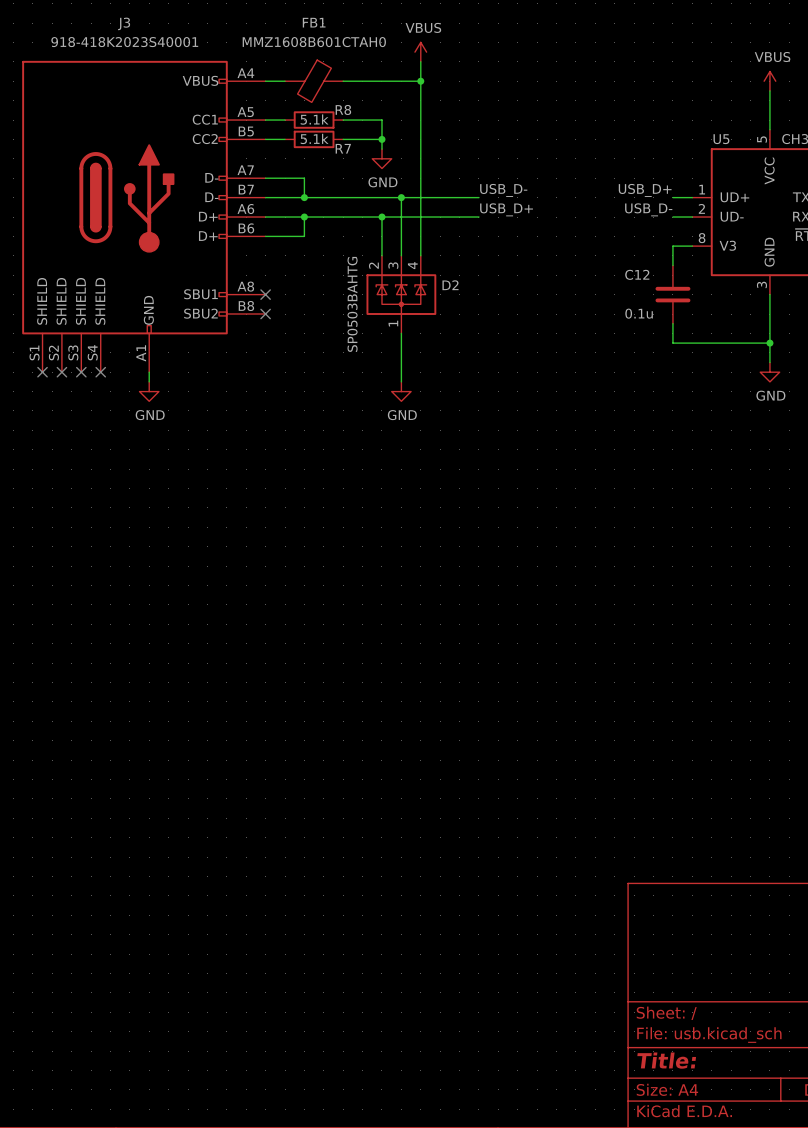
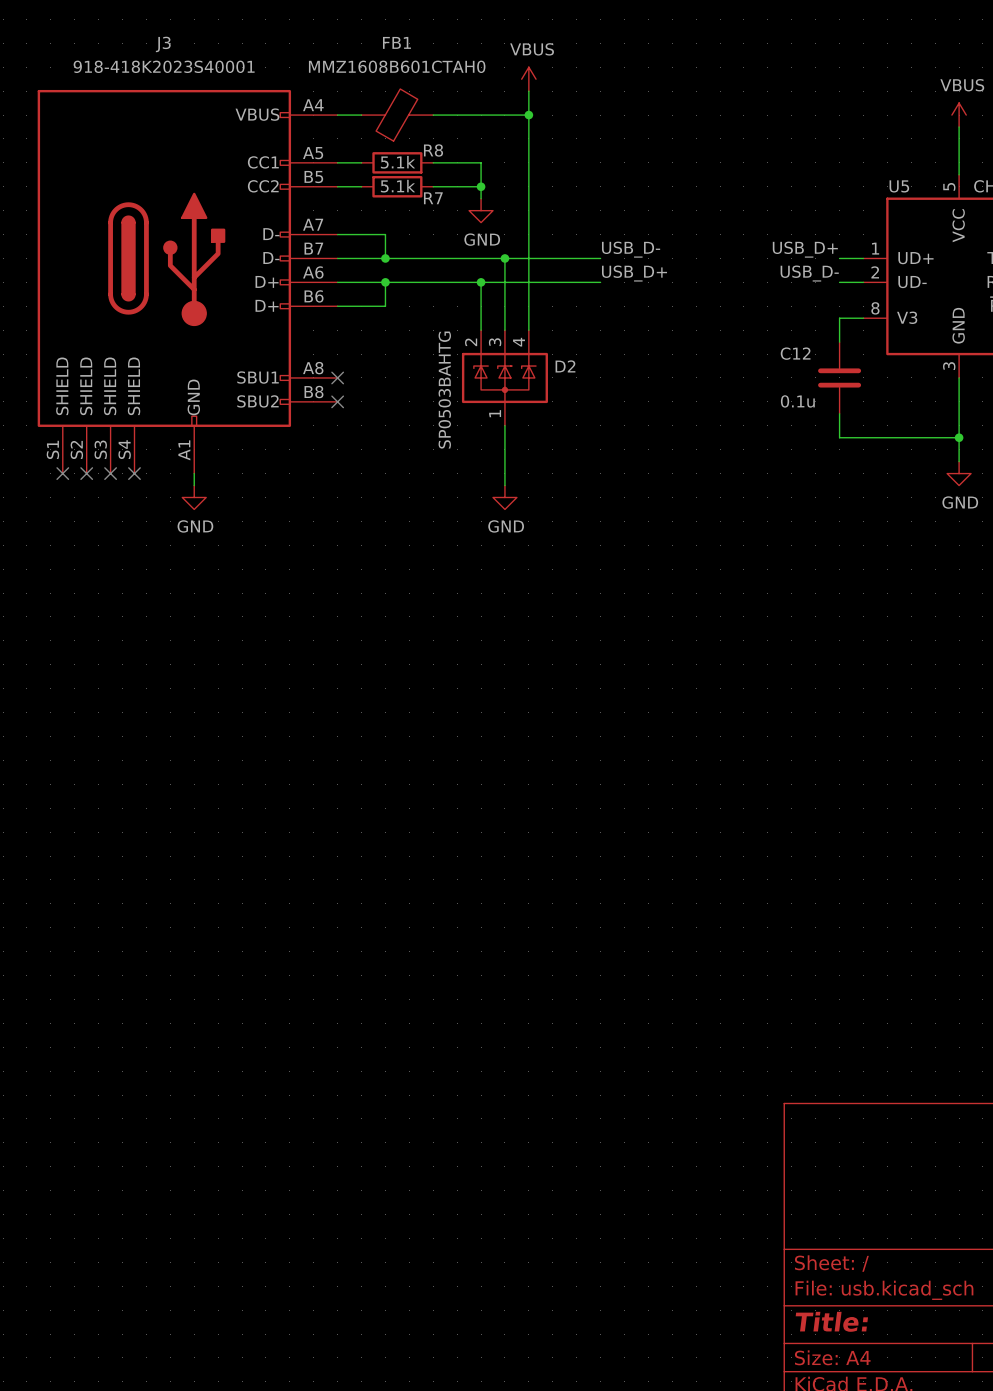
FB1 rotation: 0° (314, 81) -> 180° (396, 115)

